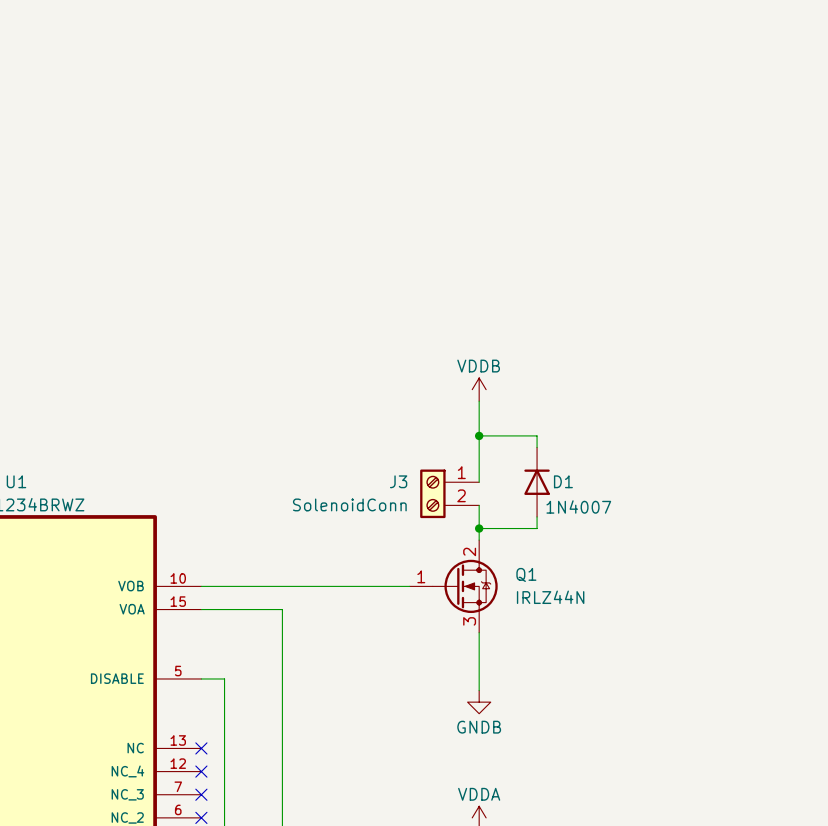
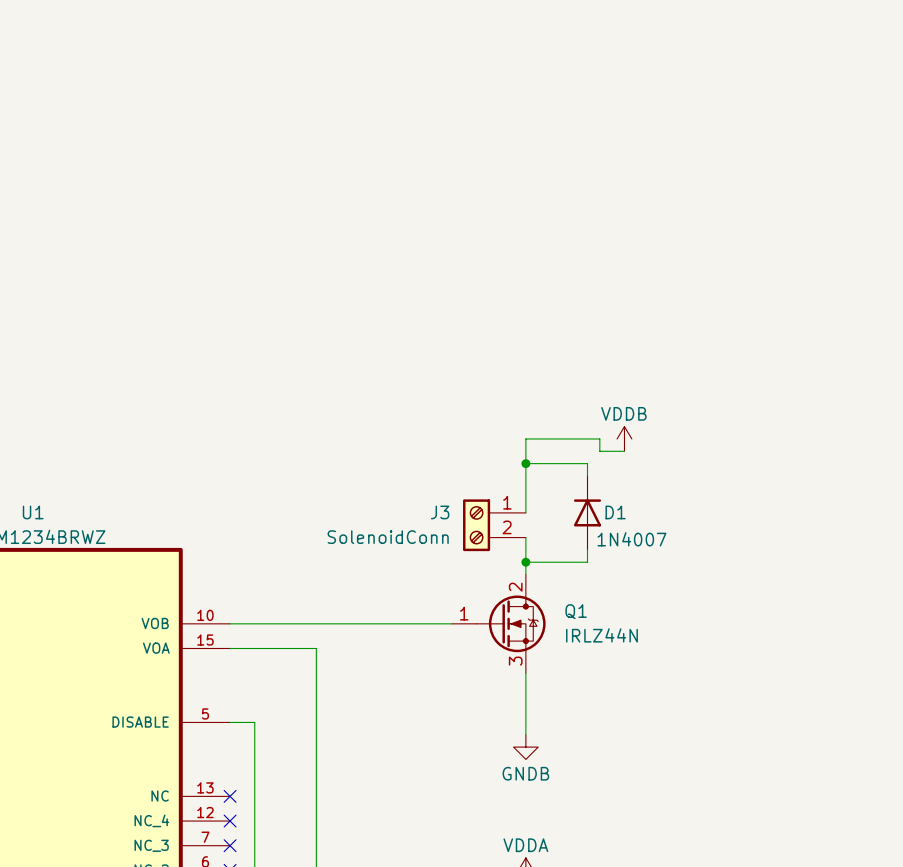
power symbol position: VDDB (479, 389) -> VDDB (624, 438)
wire: (479, 401) (479, 412) -> (624, 451) (599, 451) (599, 438) (525, 438)

